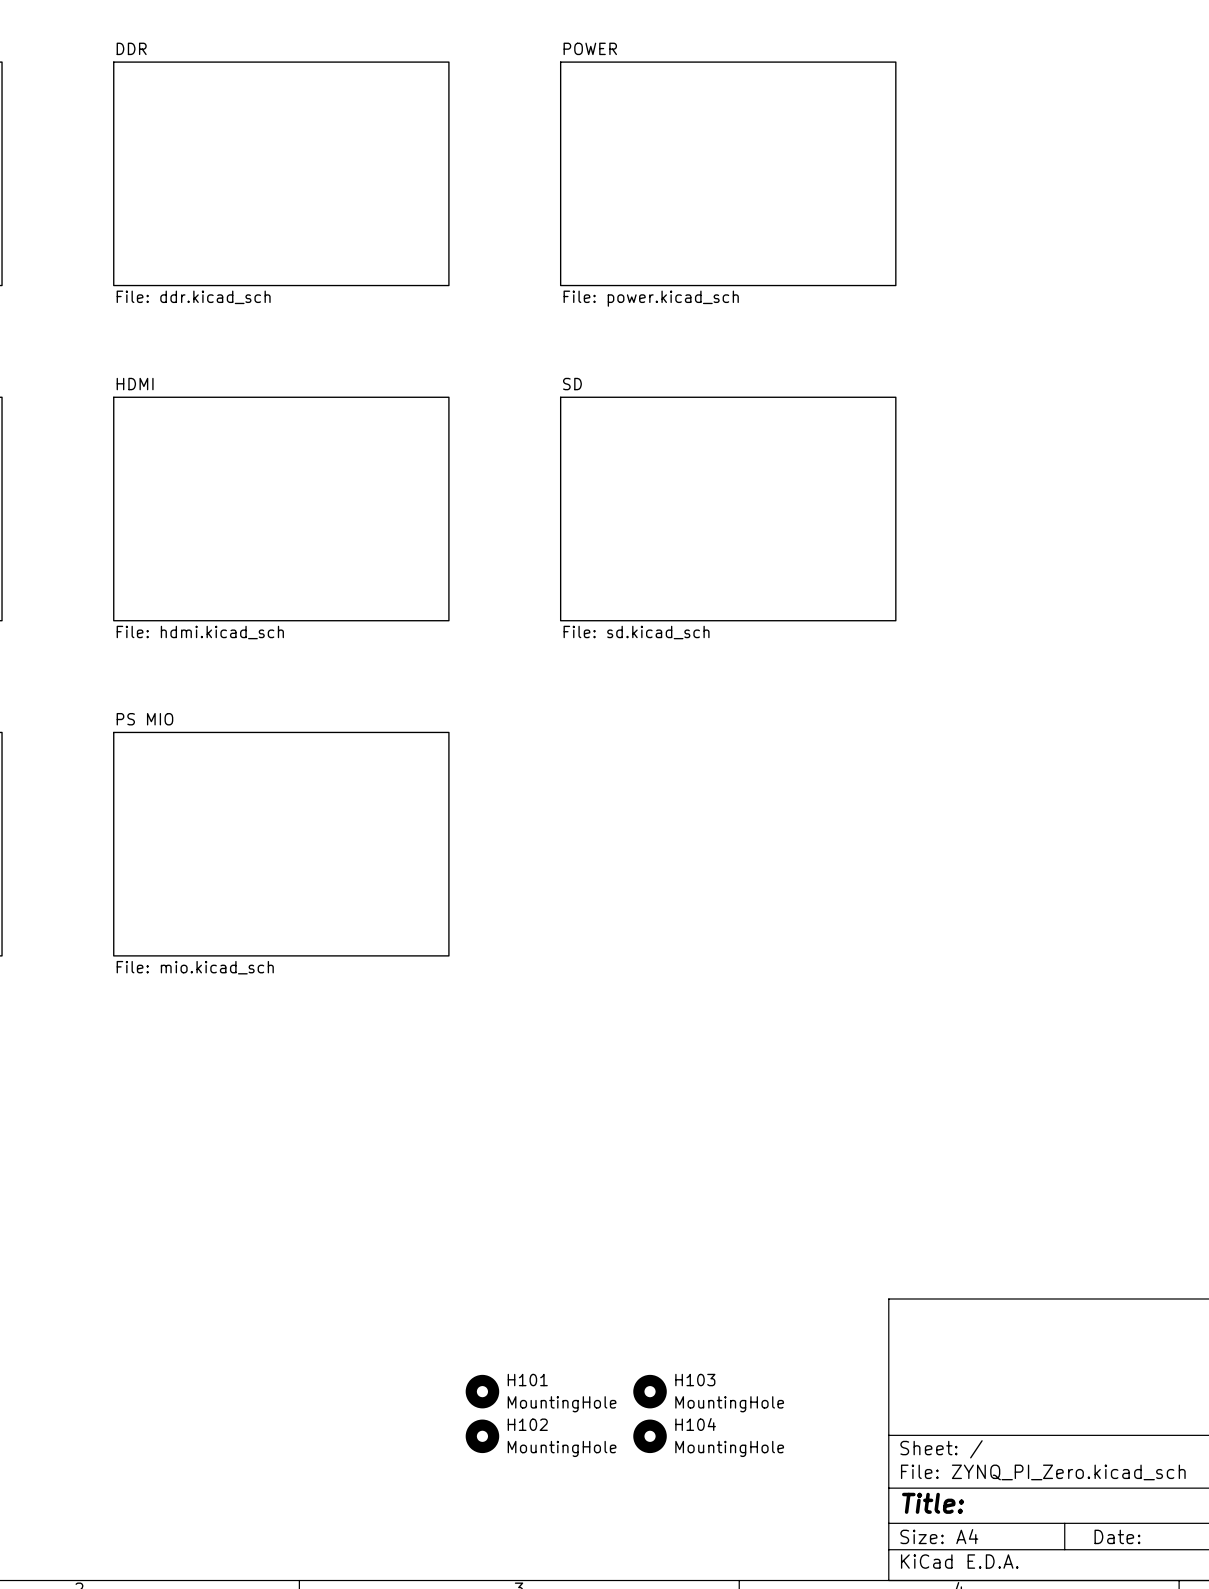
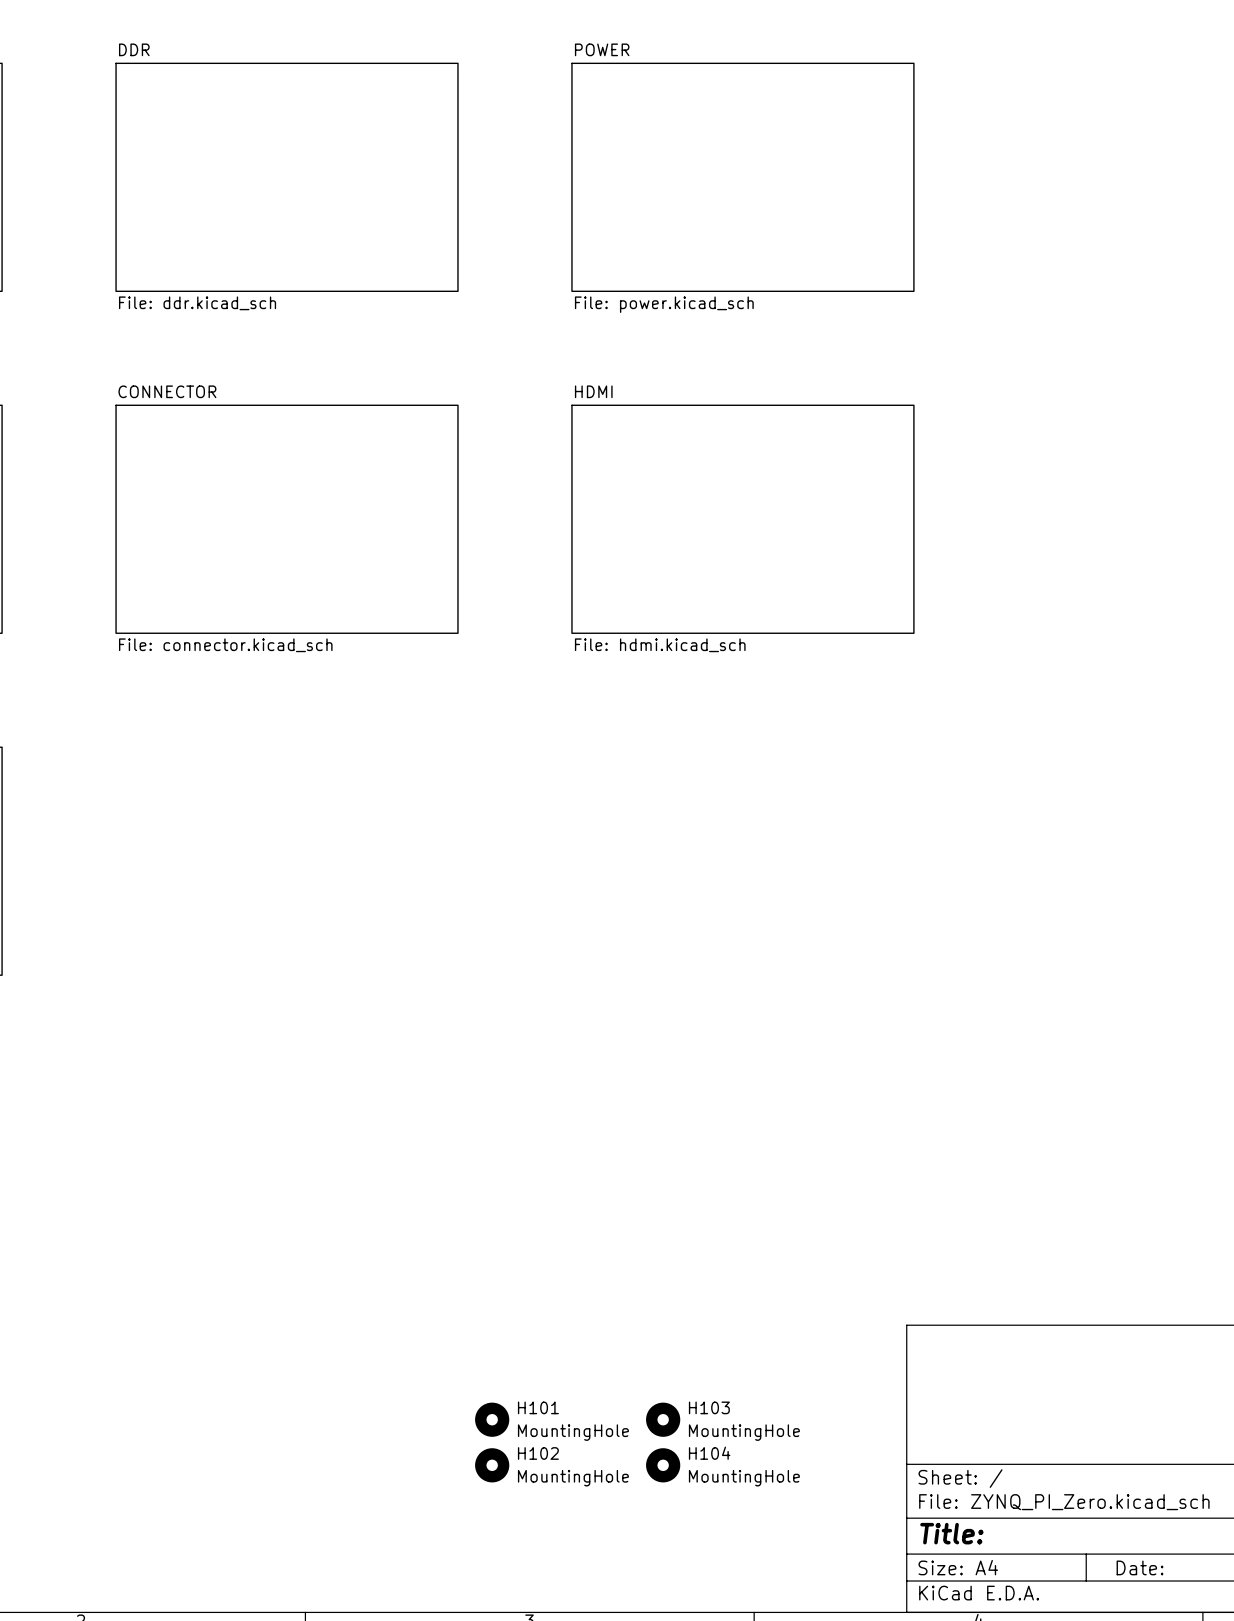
sheet HDMI name: HDMI (135, 384) -> CONNECTOR (167, 391)
sheet SD name: SD (572, 384) -> HDMI (593, 391)
sheet HDMI value: File: hdmi.kicad_sch (200, 632) -> File: connector.kicad_sch (225, 645)
sheet SD value: File: sd.kicad_sch (636, 632) -> File: hdmi.kicad_sch (660, 645)
sheet PS MIO: File: mio.kicad_sch (281, 844) -> none

